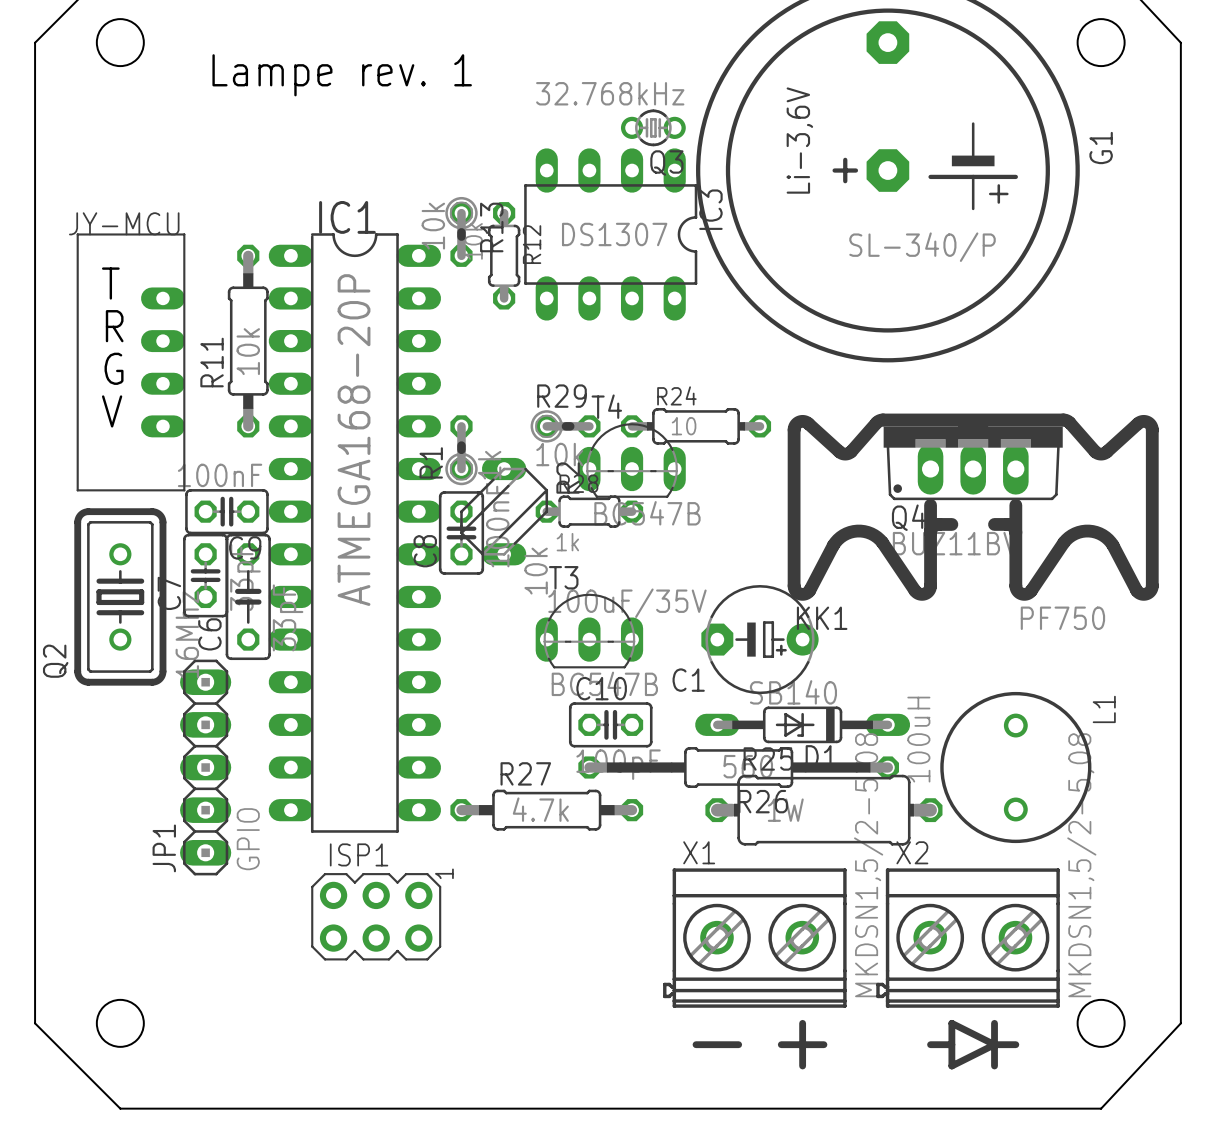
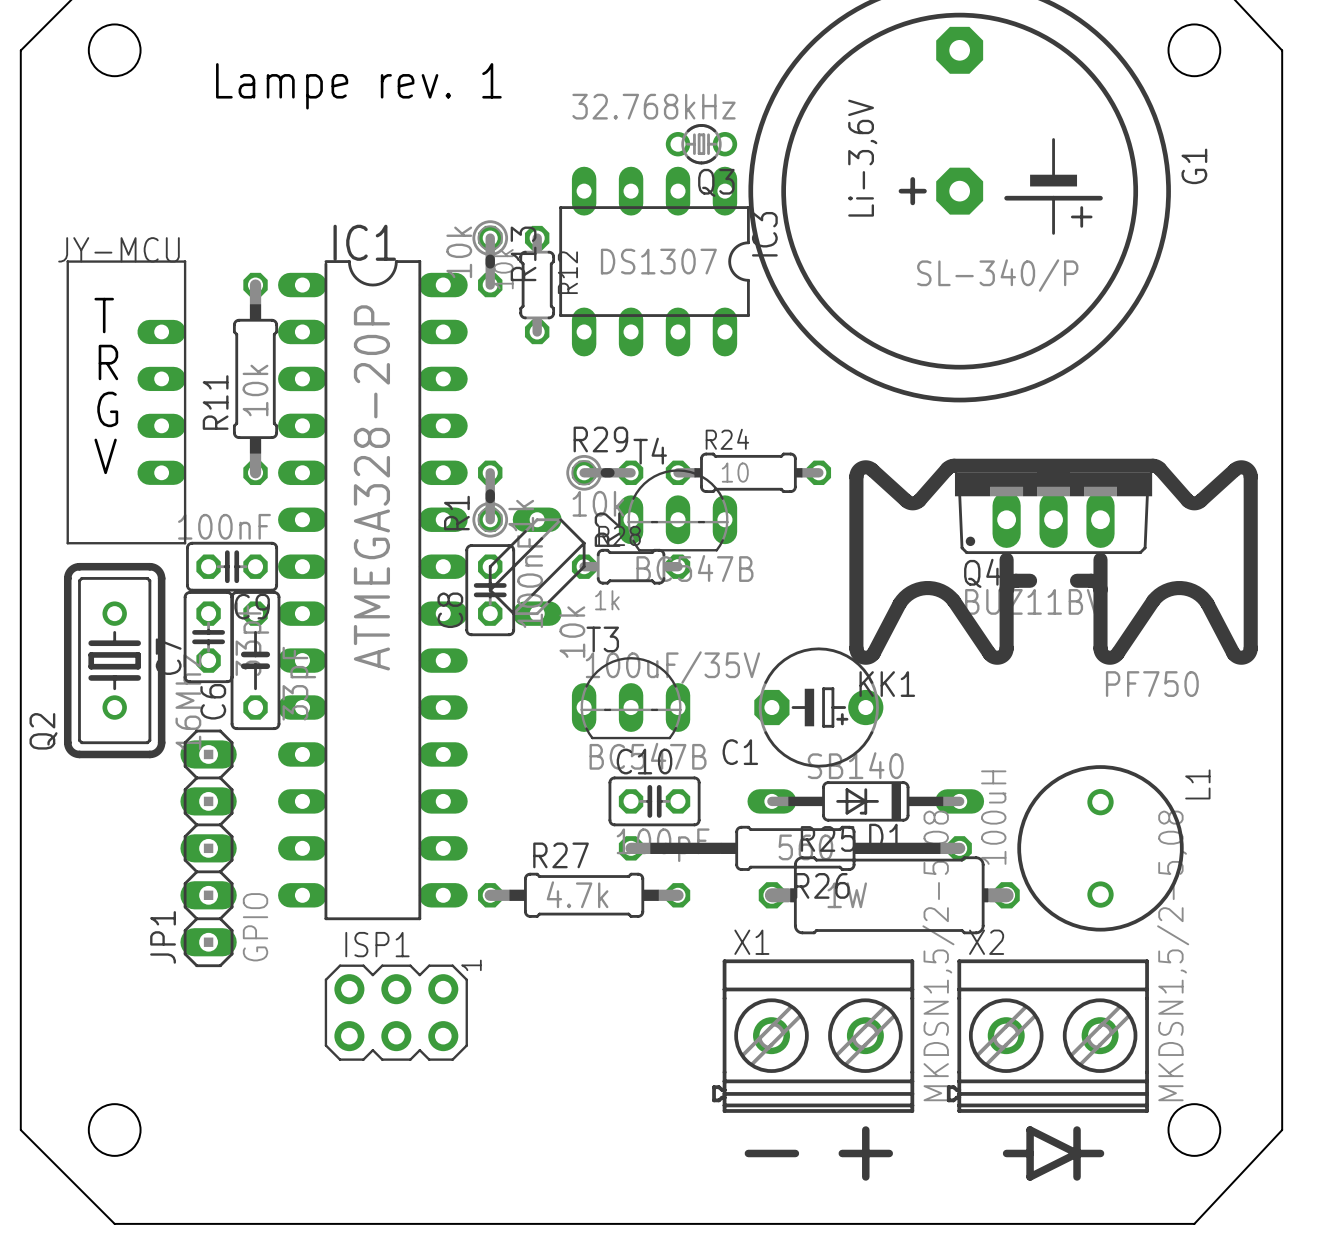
IC1 value: ATMEGA168-20P (354, 440) -> ATMEGA328-20P (371, 487)

